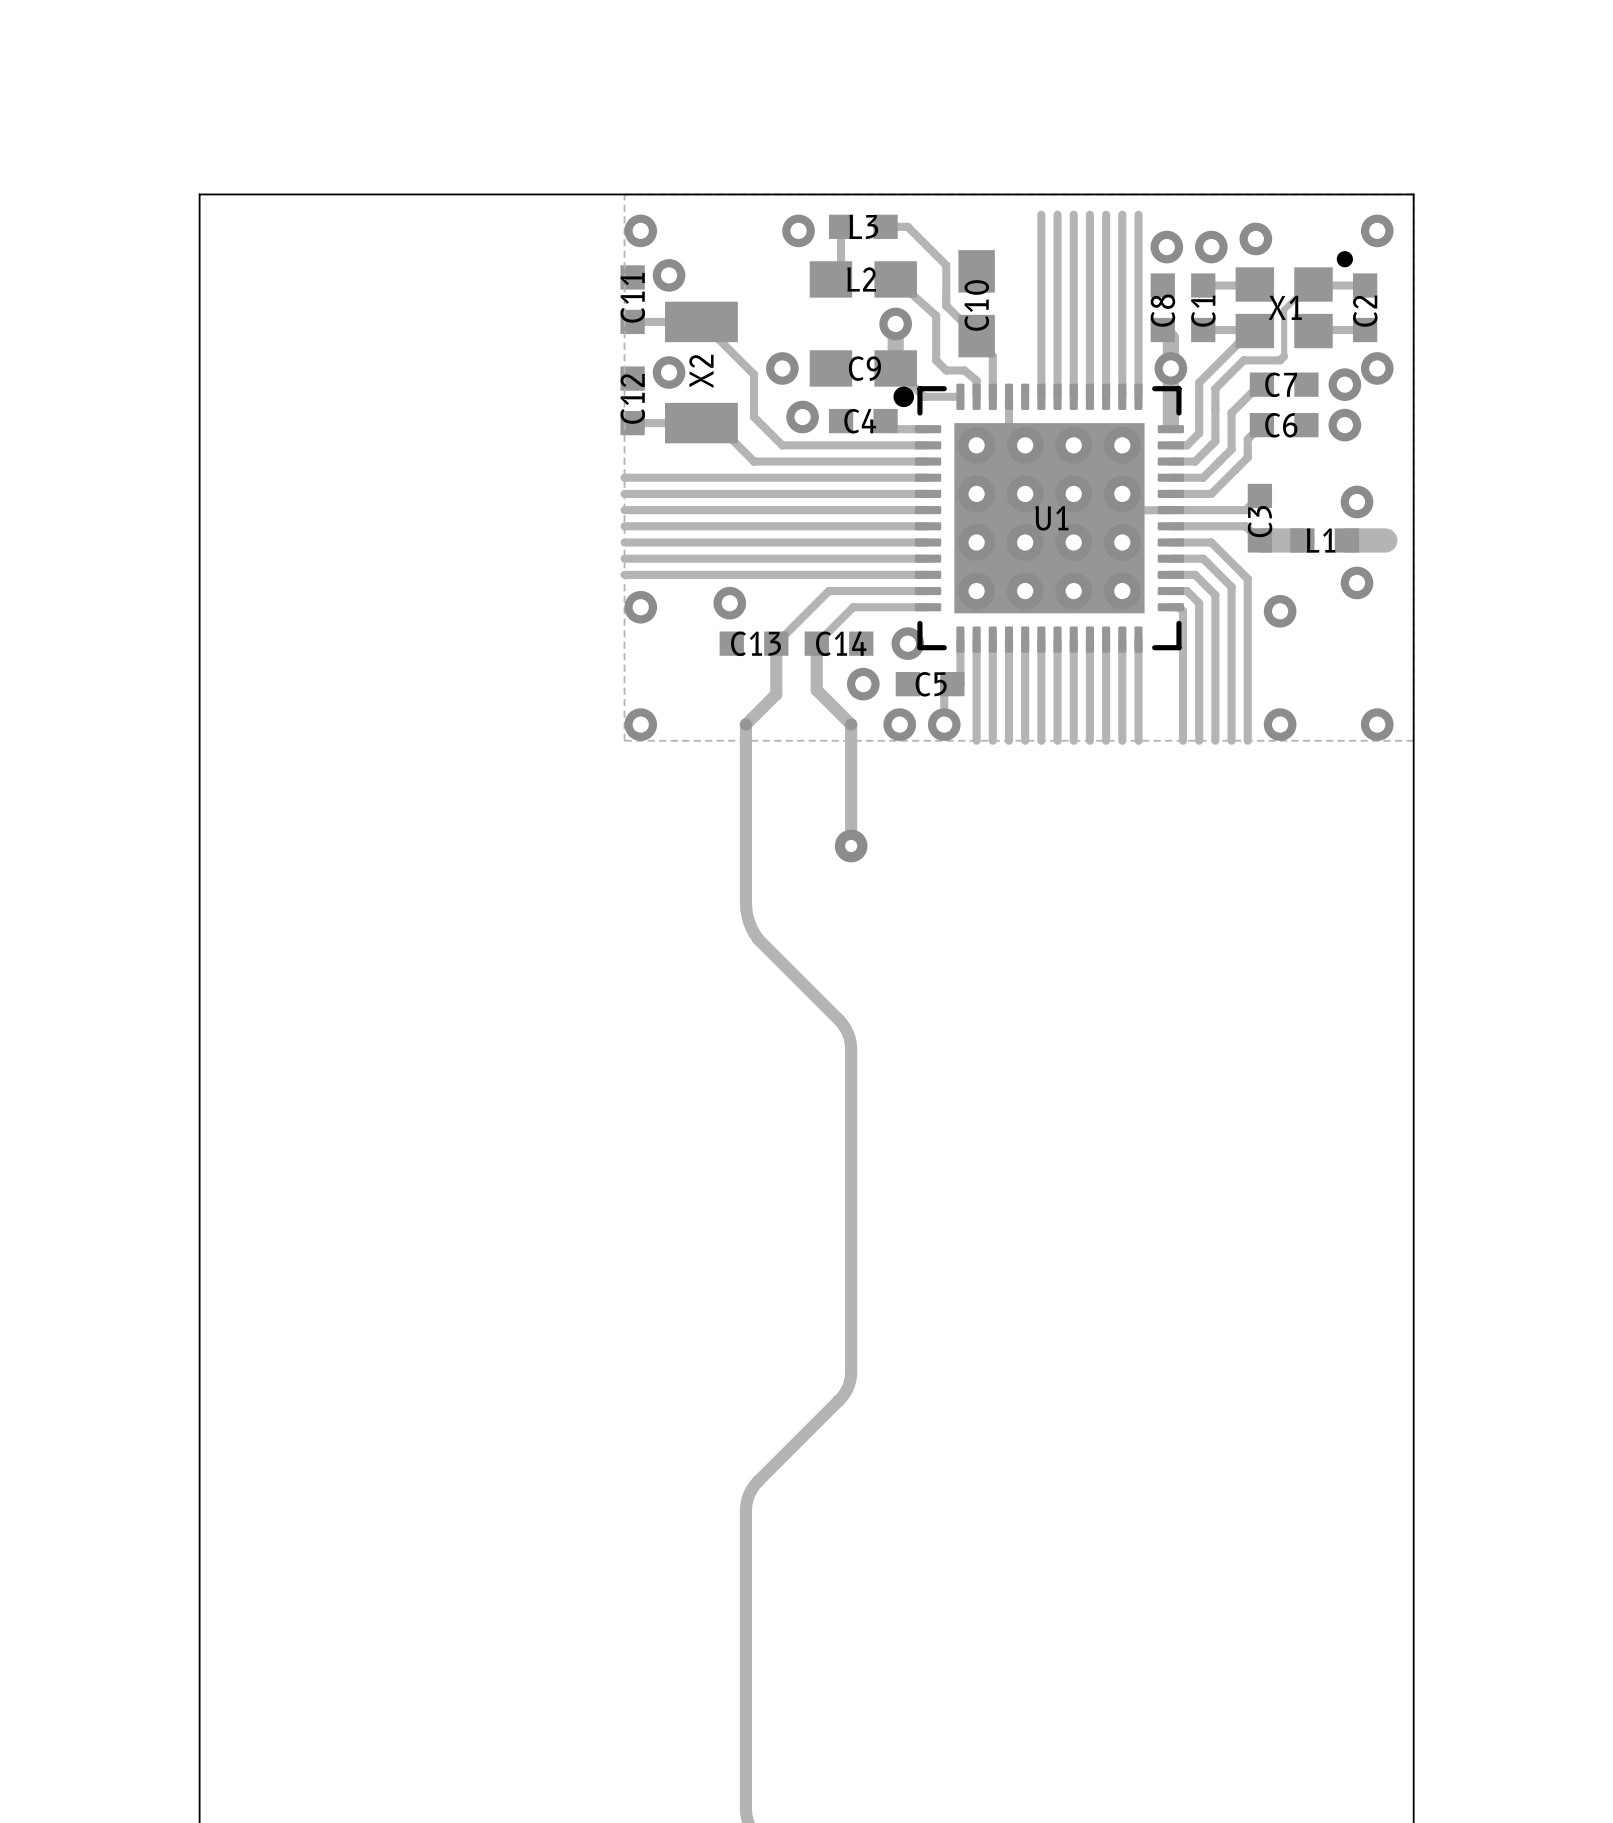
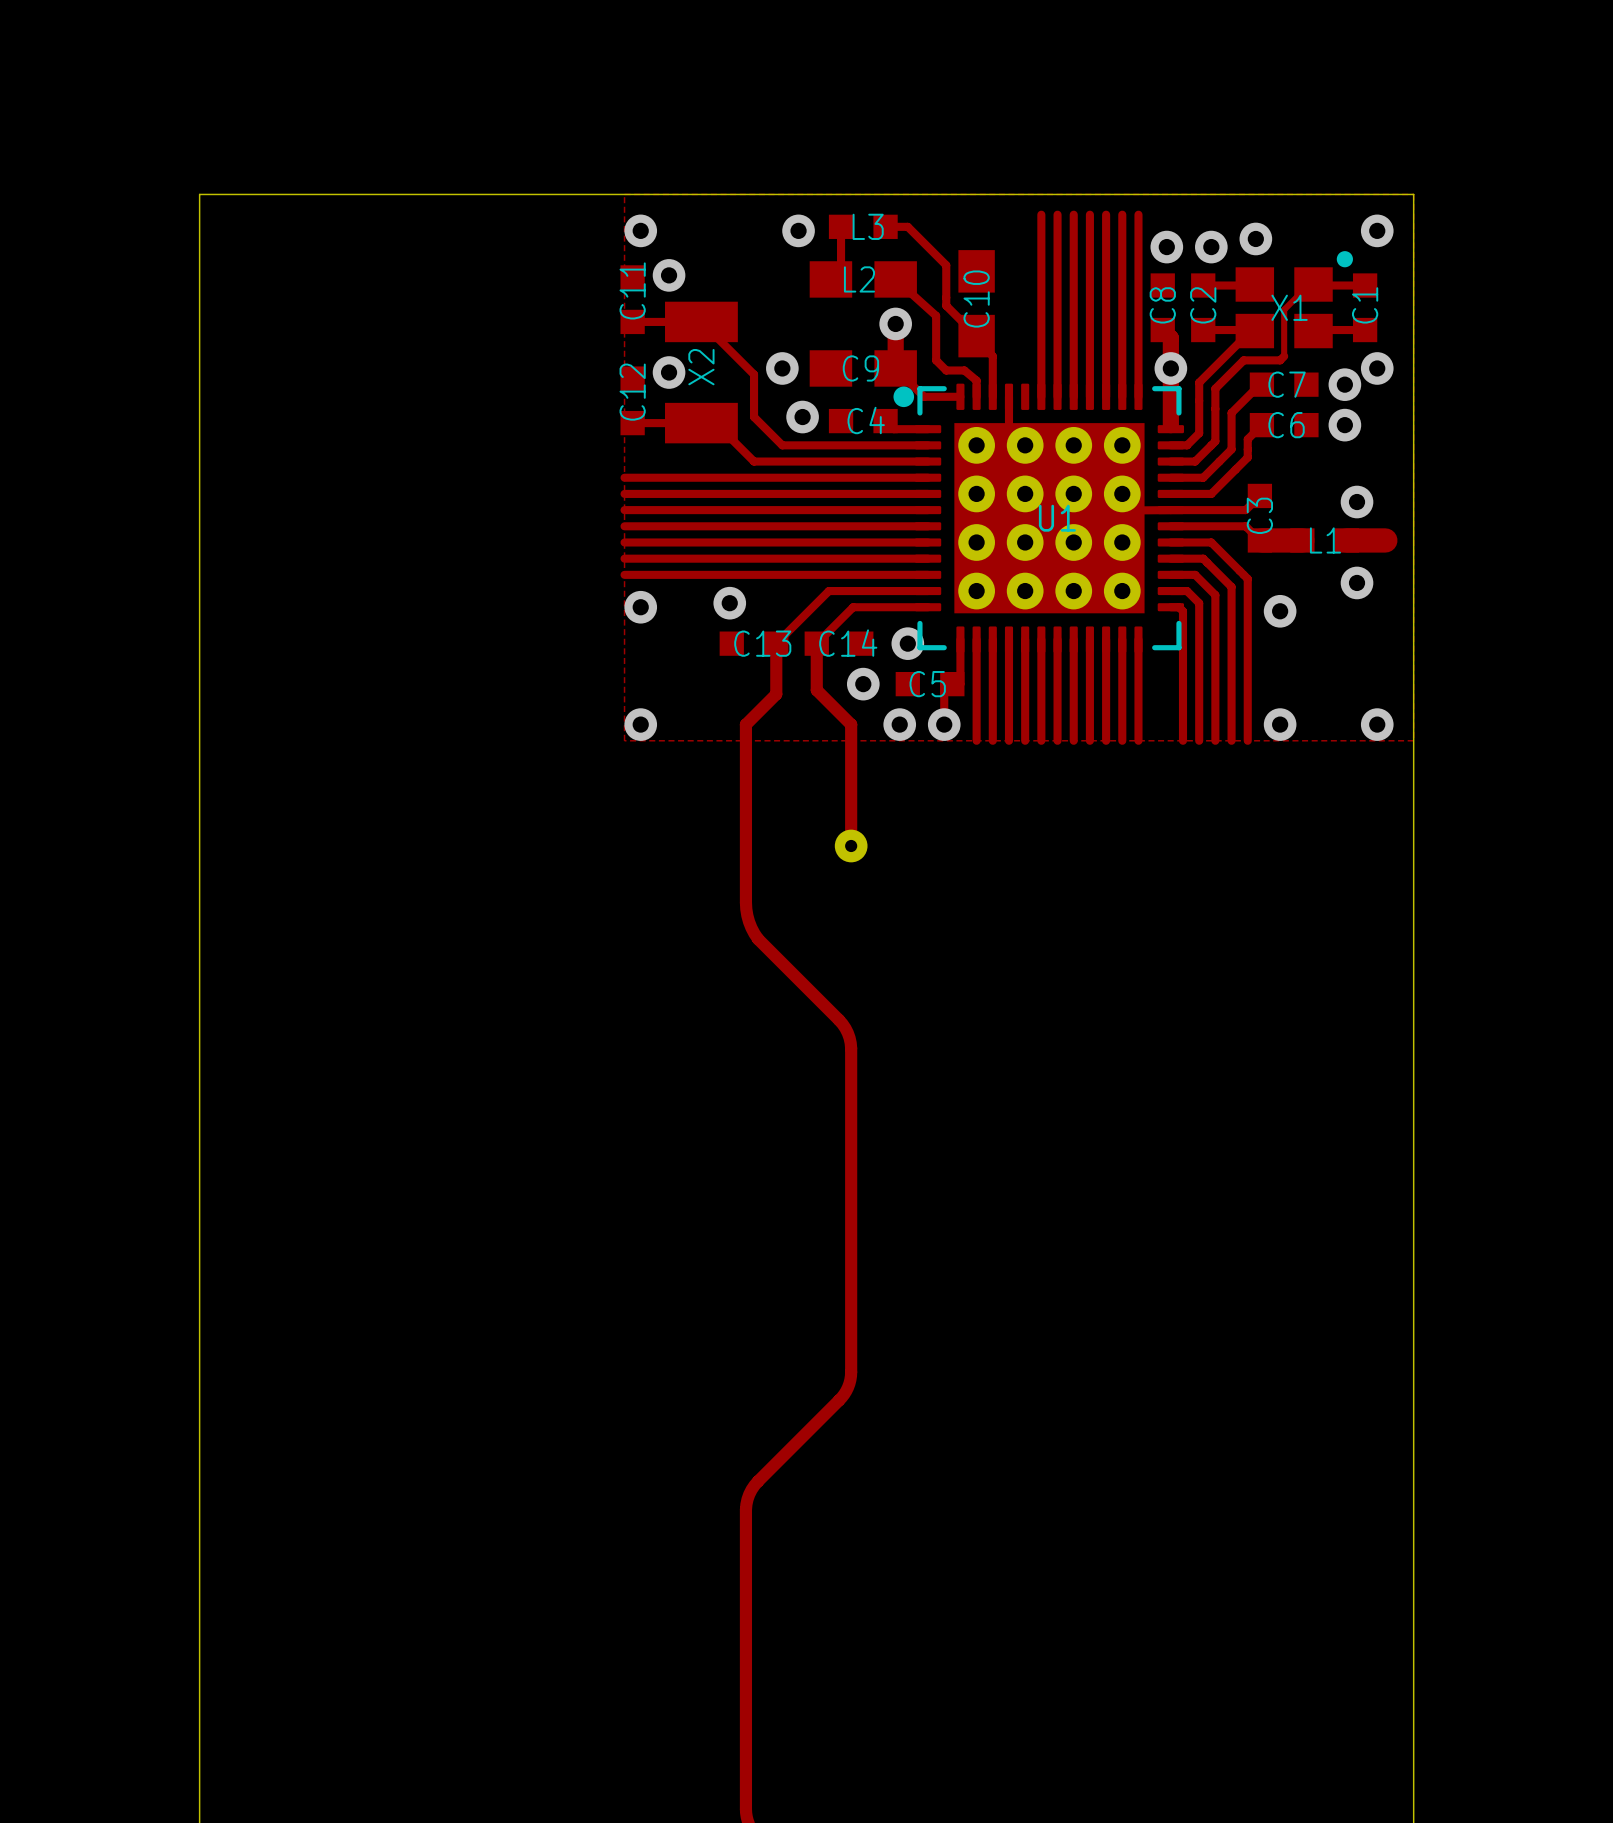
C1 name: C1 (1203, 311) -> C2 (1203, 305)
C2 name: C2 (1365, 311) -> C1 (1365, 305)

